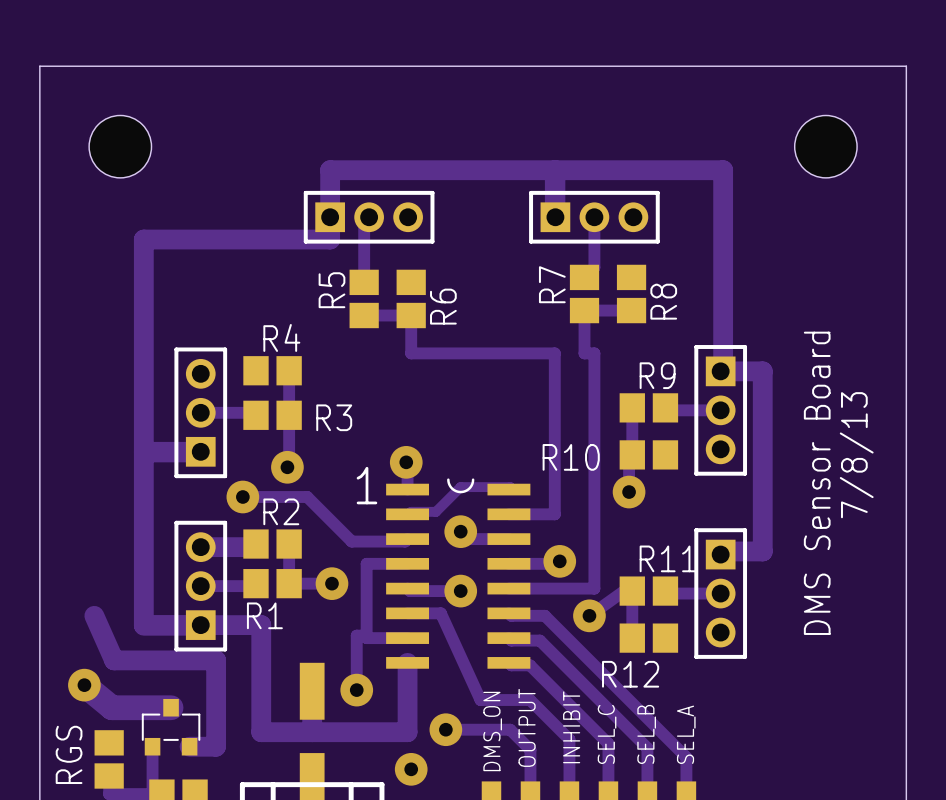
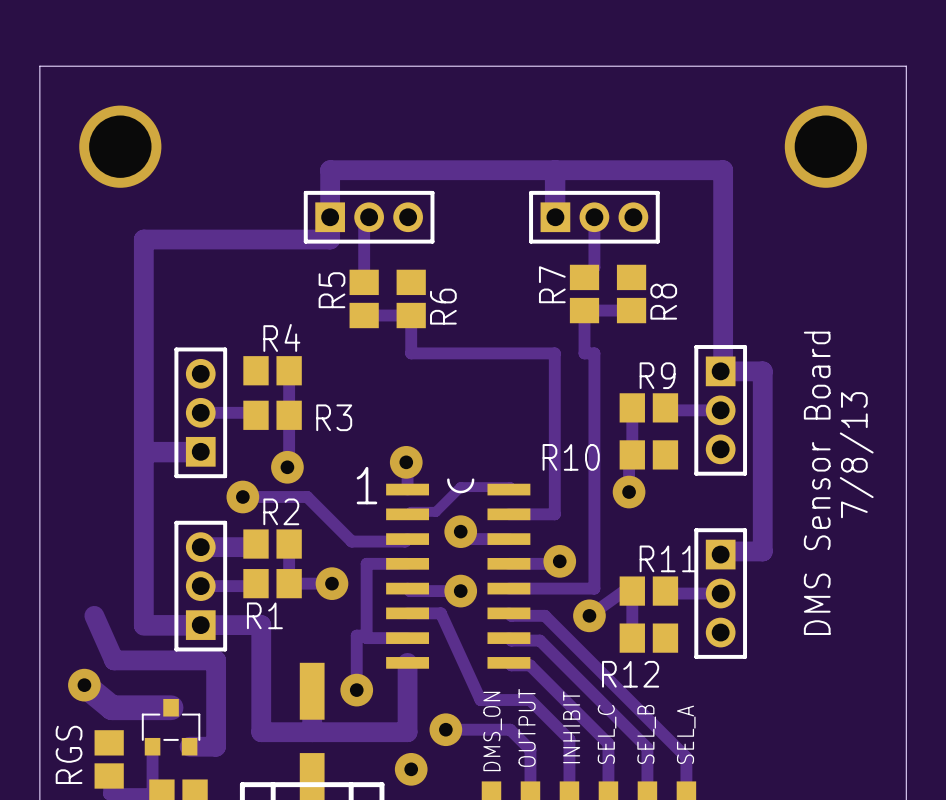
hole: (120, 146) -> none
via: none -> (120, 146)
hole: (825, 146) -> none
via: none -> (825, 146)

